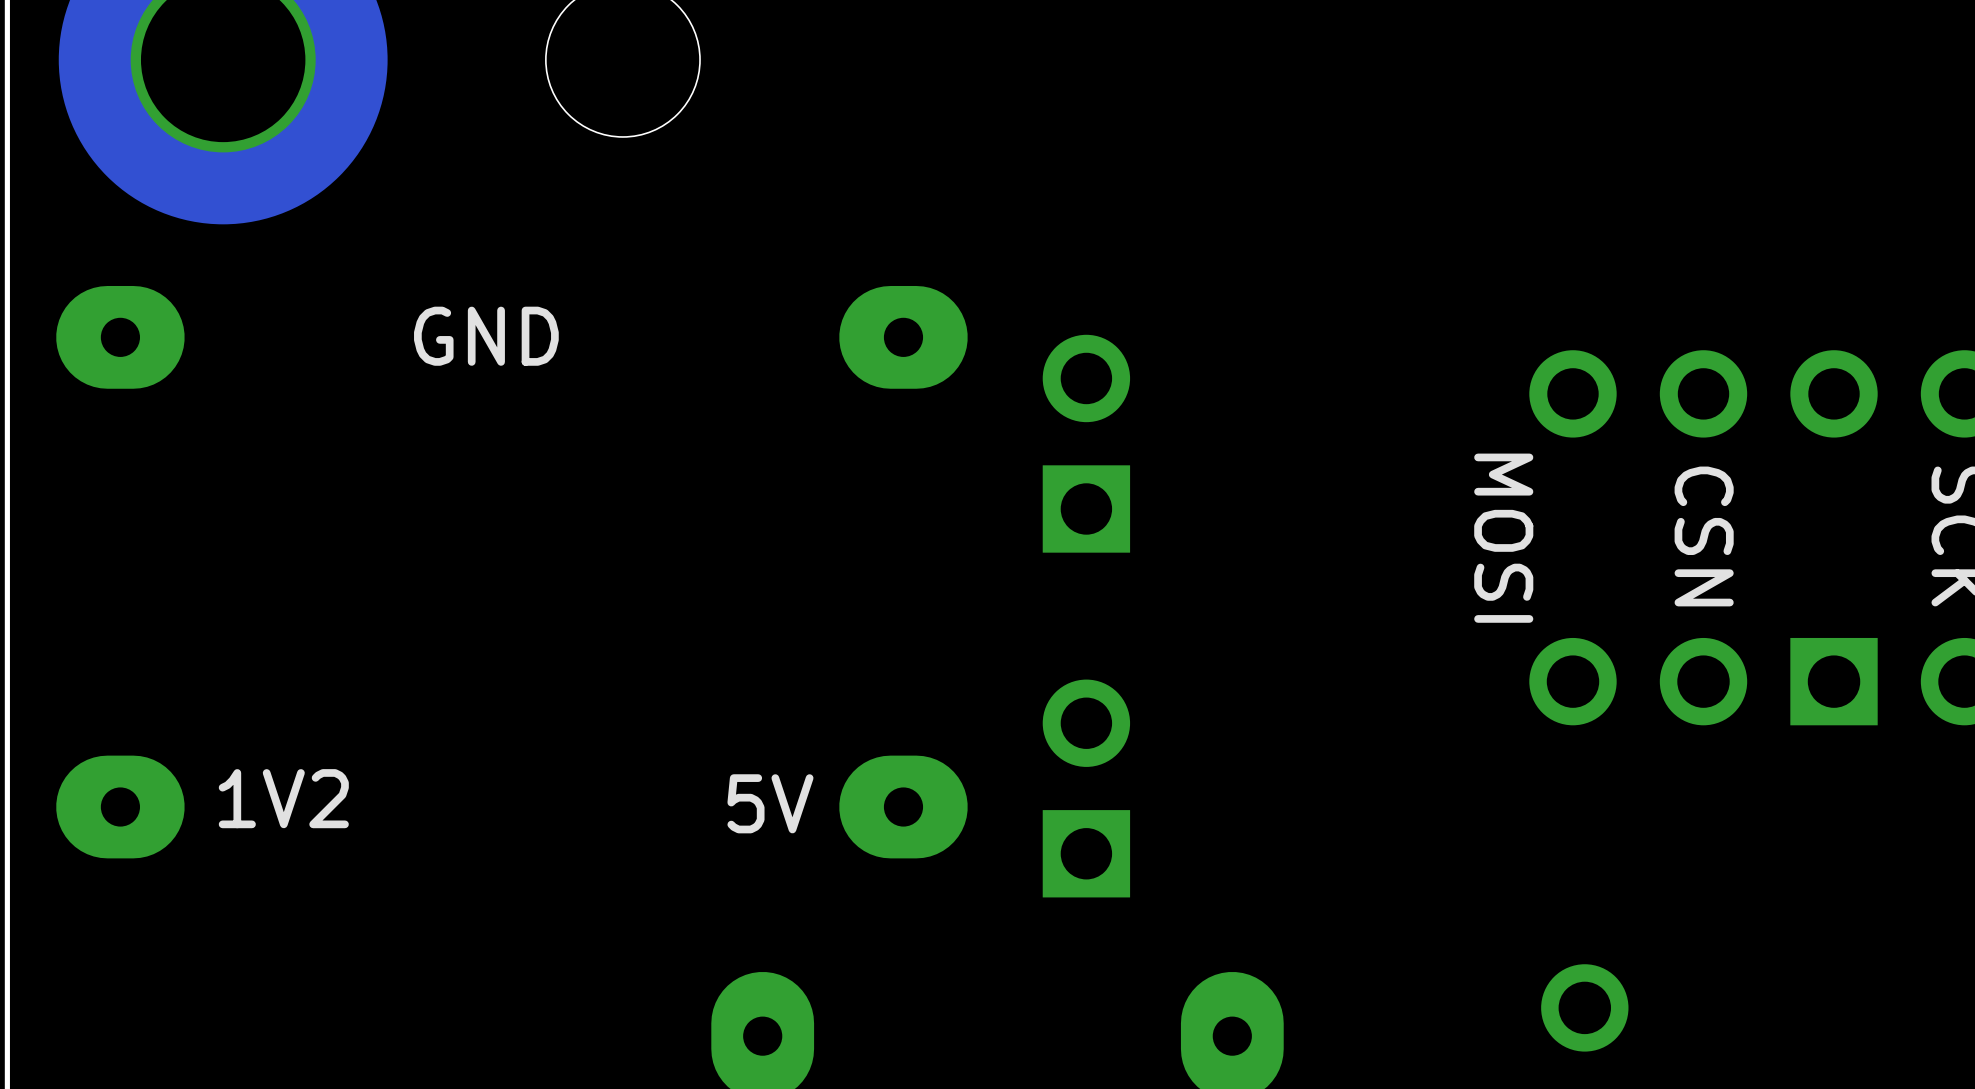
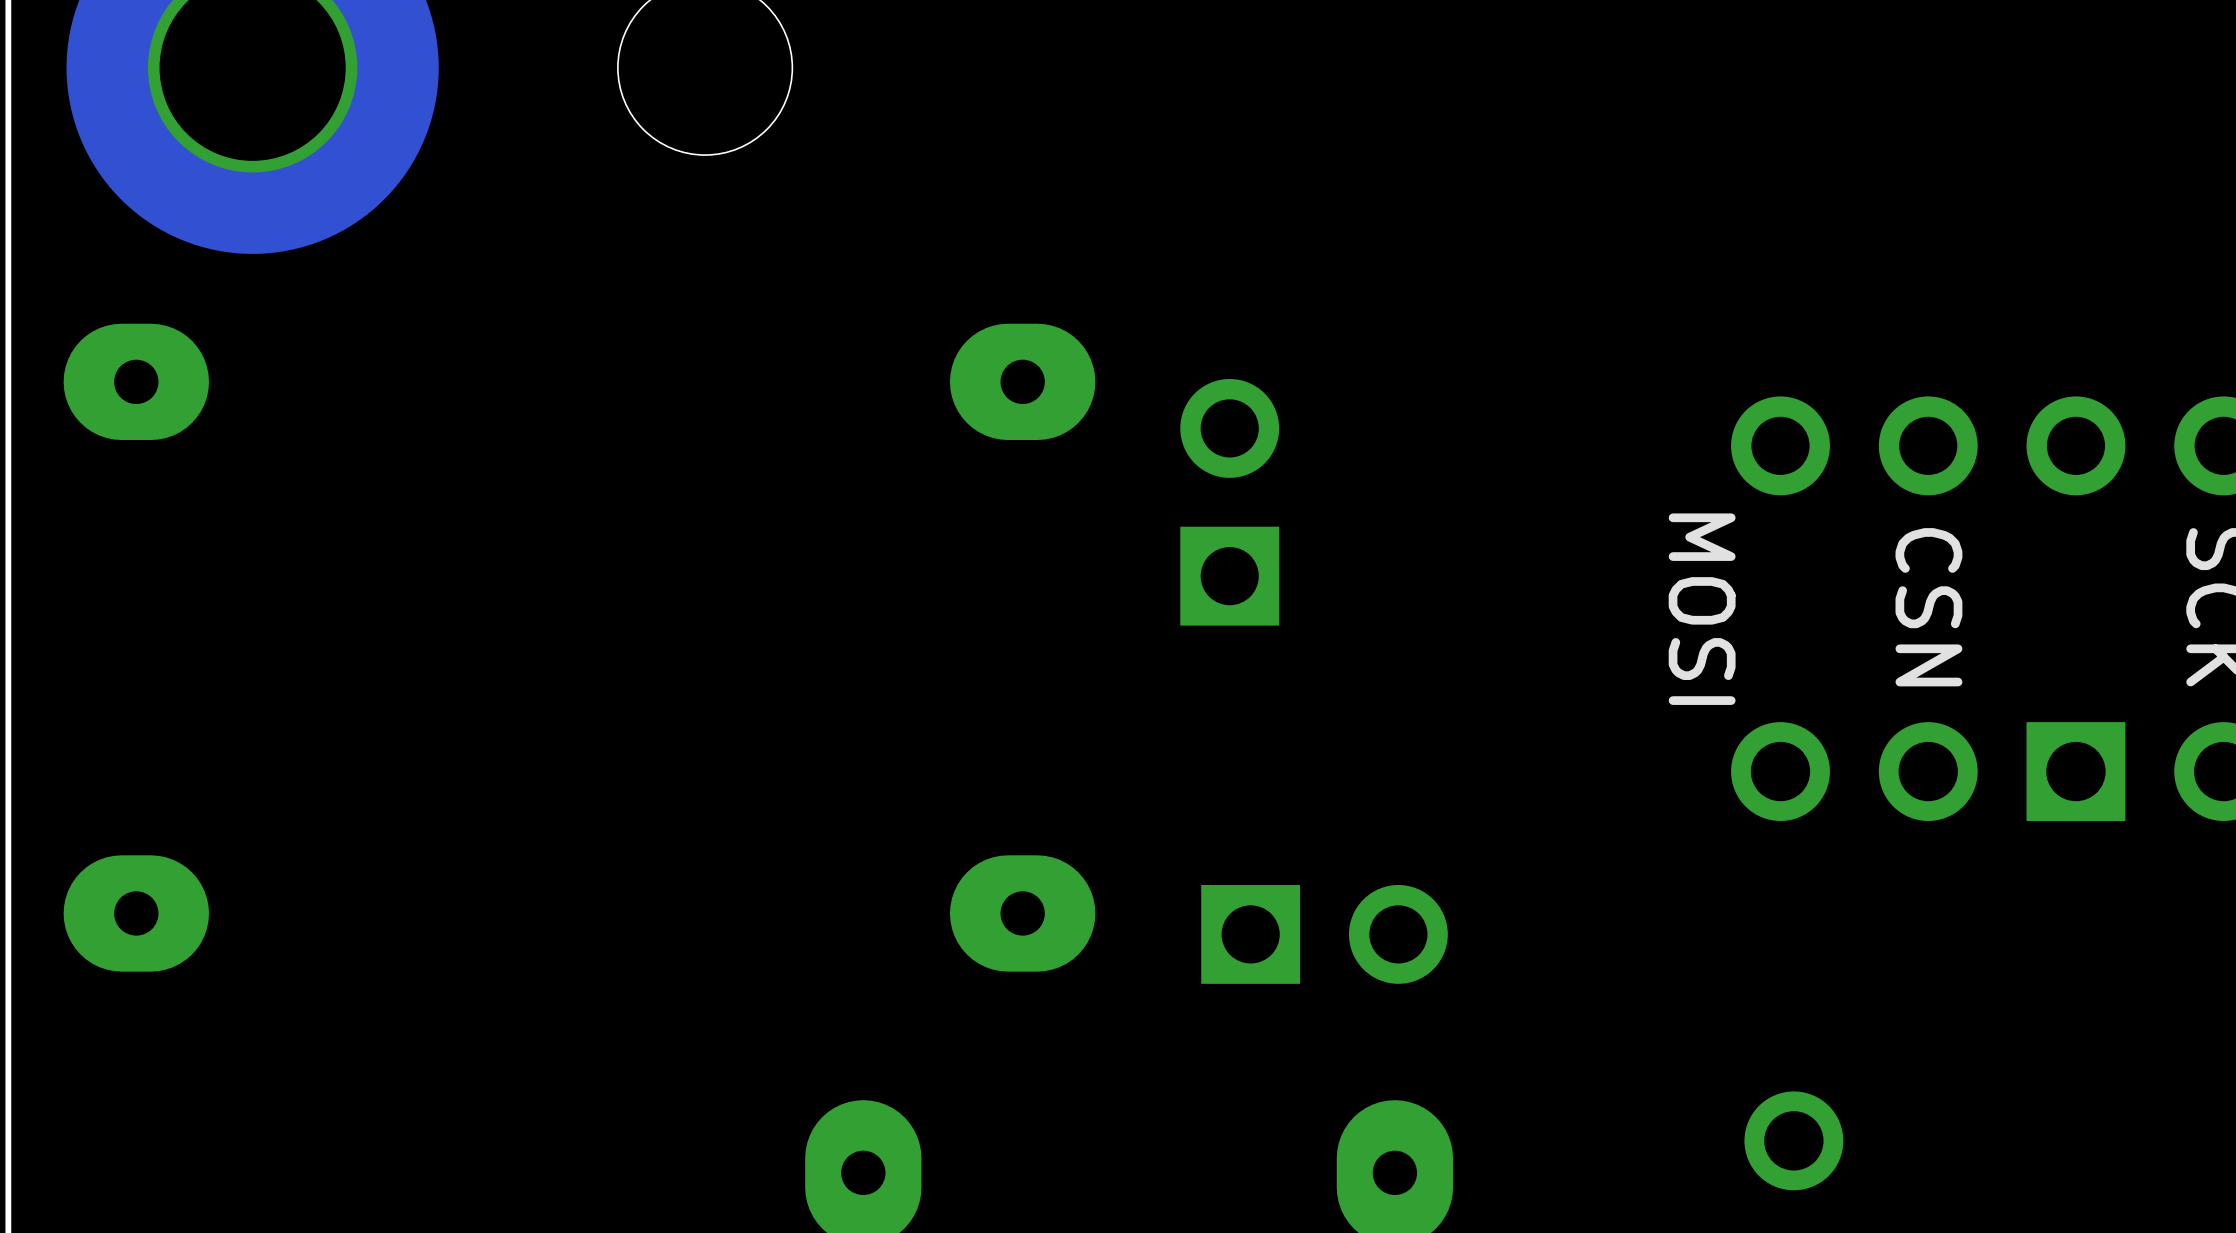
text: GND (486, 336) -> none
part rotation: 0° (1086, 788) -> 90° clockwise (1324, 934)
text: 1V2 (283, 798) -> none
text: 5V (770, 803) -> none

